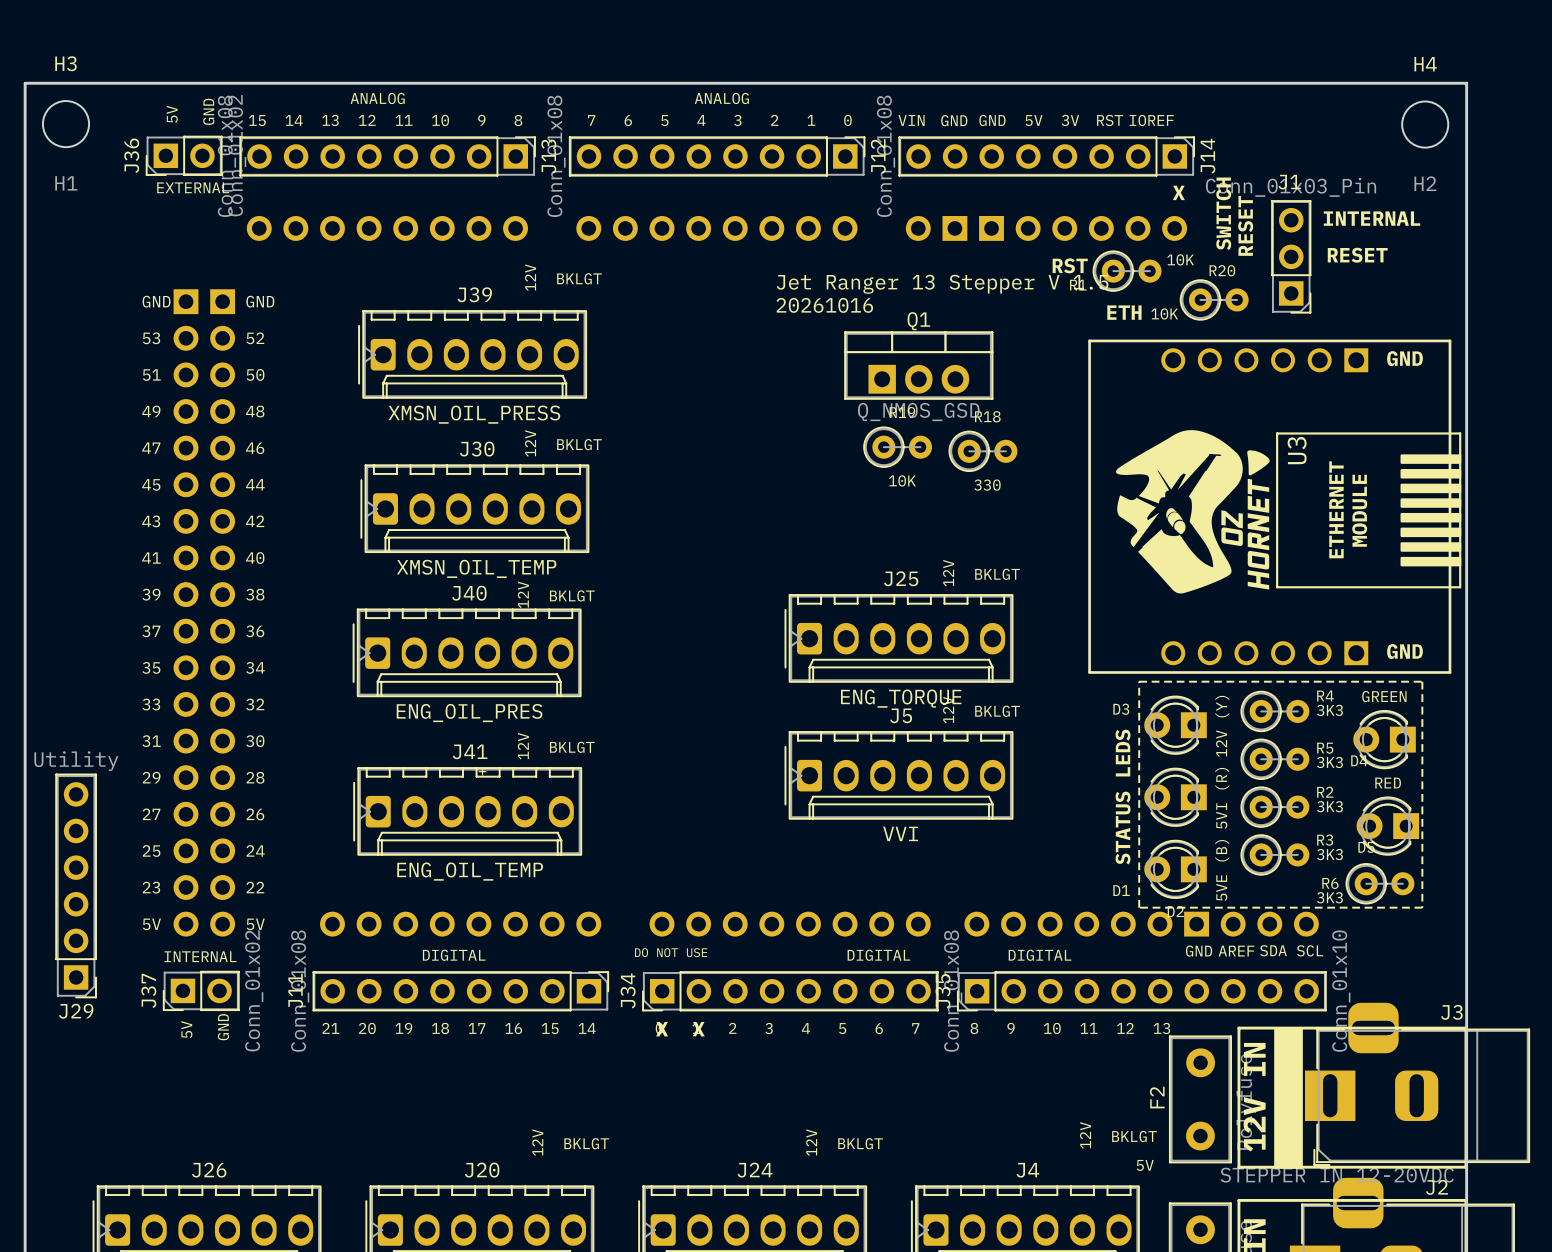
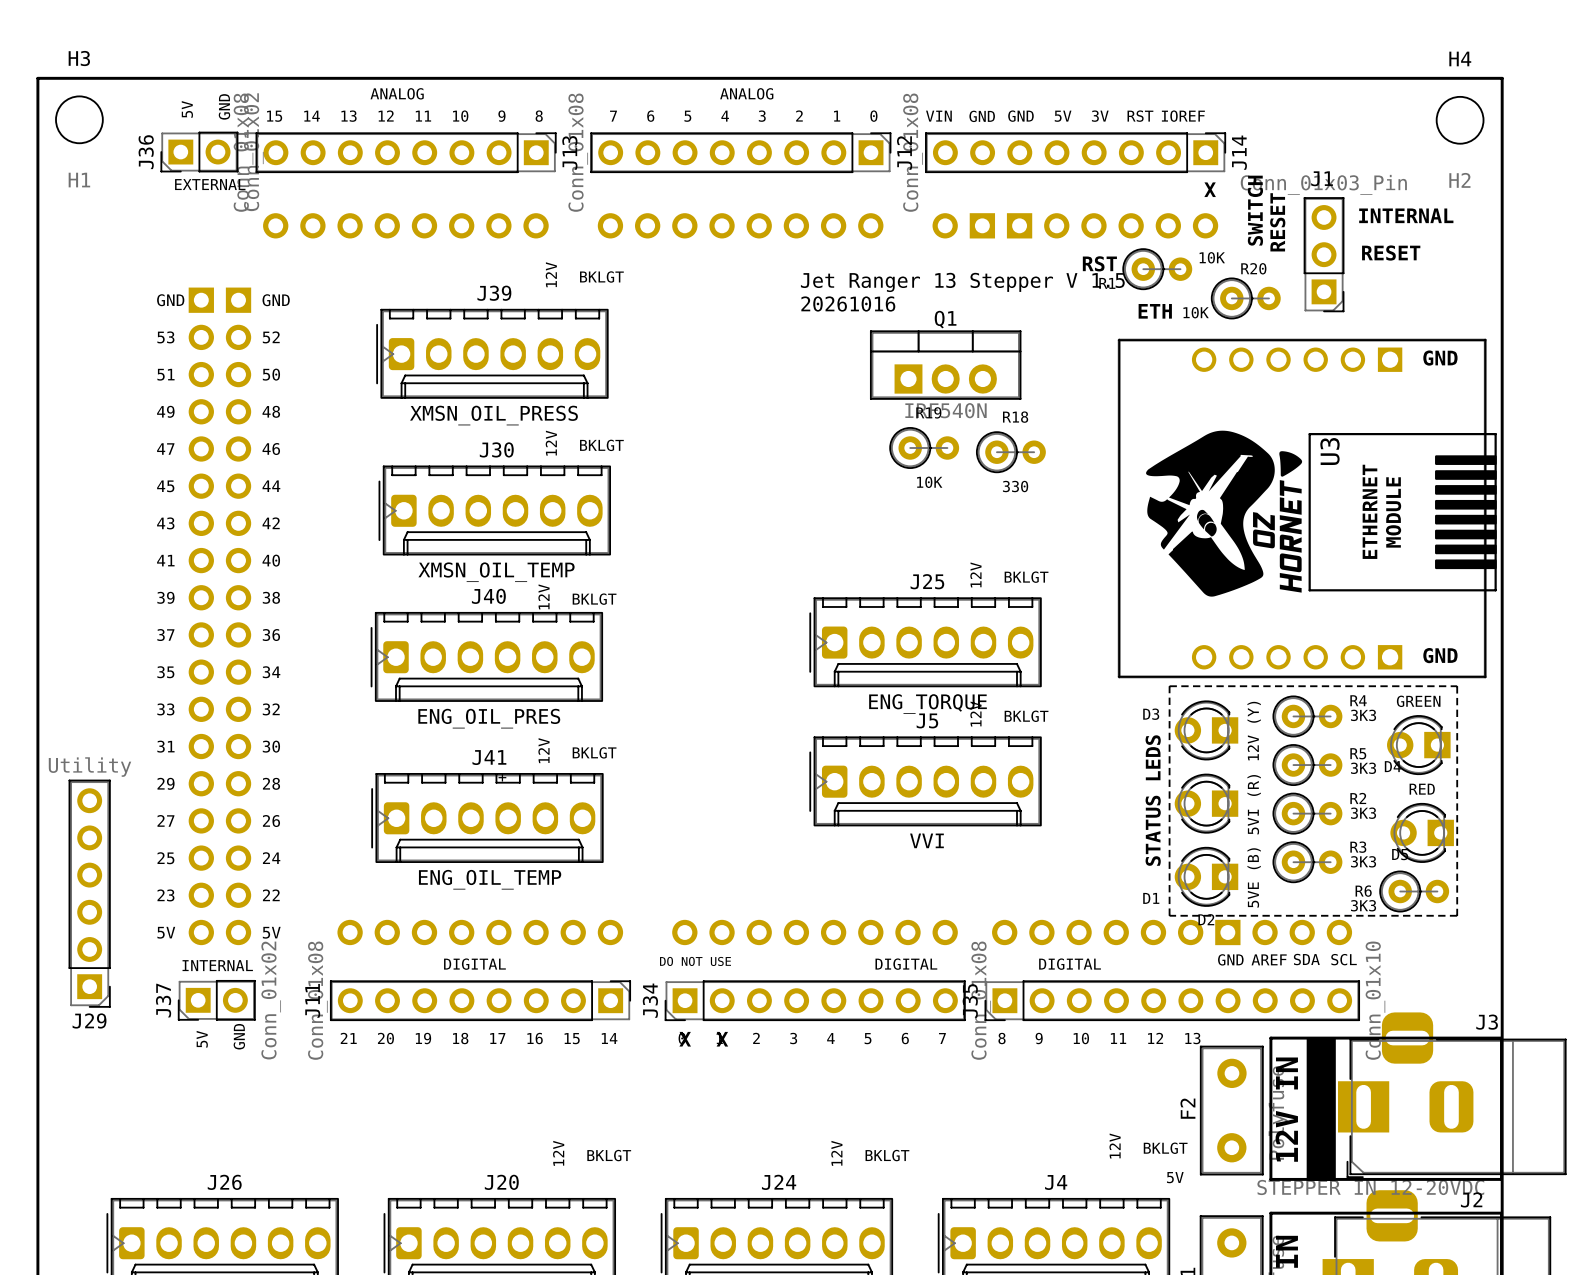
Q1 value: Q_NMOS_GSD (918, 412) -> IRF540N (946, 410)

